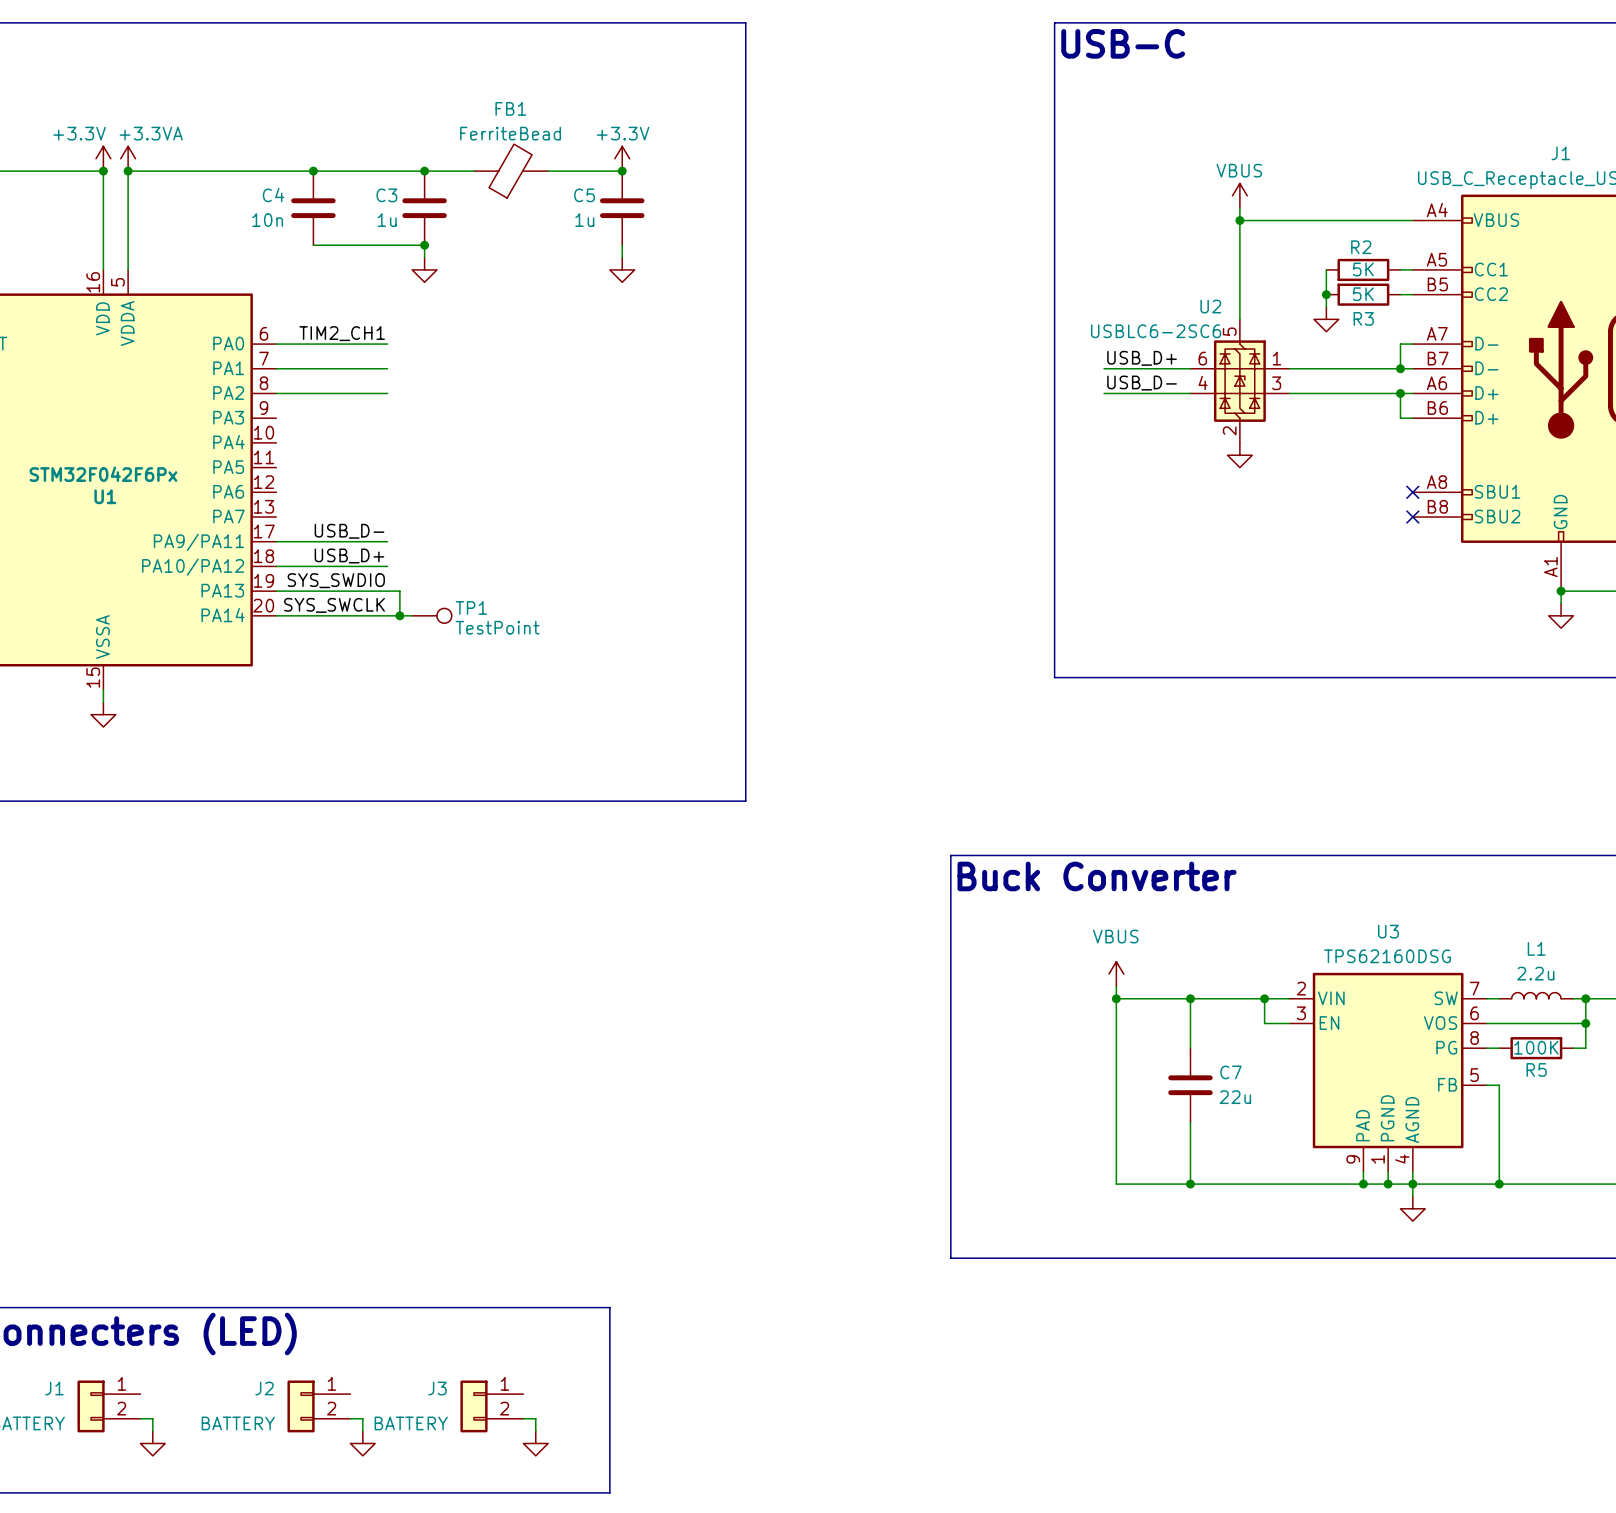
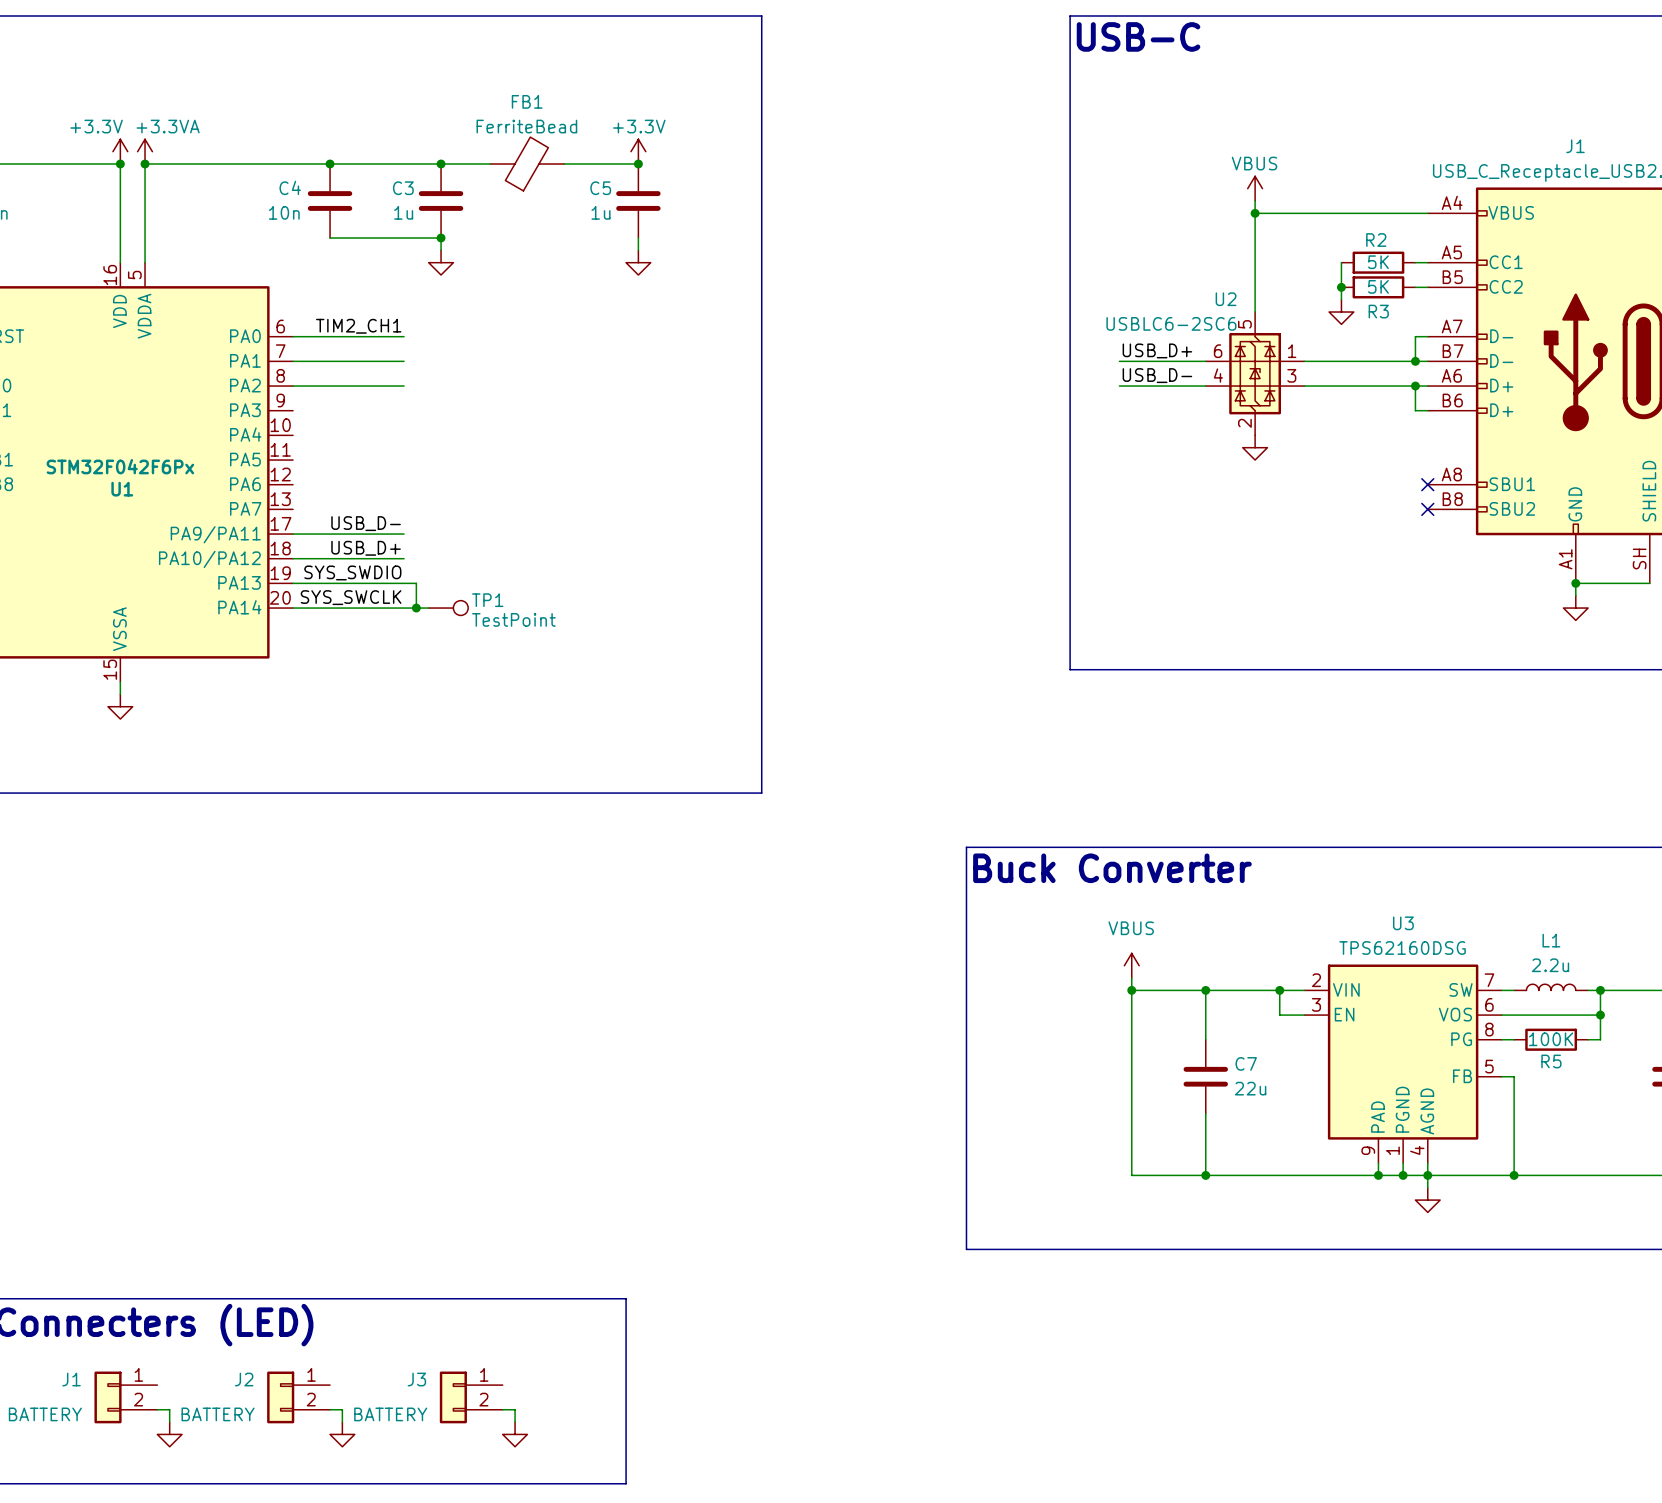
J2 position: (318, 1406) -> (298, 1397)
J3 position: (491, 1406) -> (471, 1397)
wire: (350, 1418) (362, 1418) (362, 1431) -> (330, 1409) (342, 1409) (342, 1422)
wire: (523, 1418) (535, 1418) (535, 1431) -> (502, 1409) (515, 1409) (515, 1422)
power symbol position: (362, 1443) -> (342, 1434)
power symbol position: (535, 1443) -> (515, 1434)

